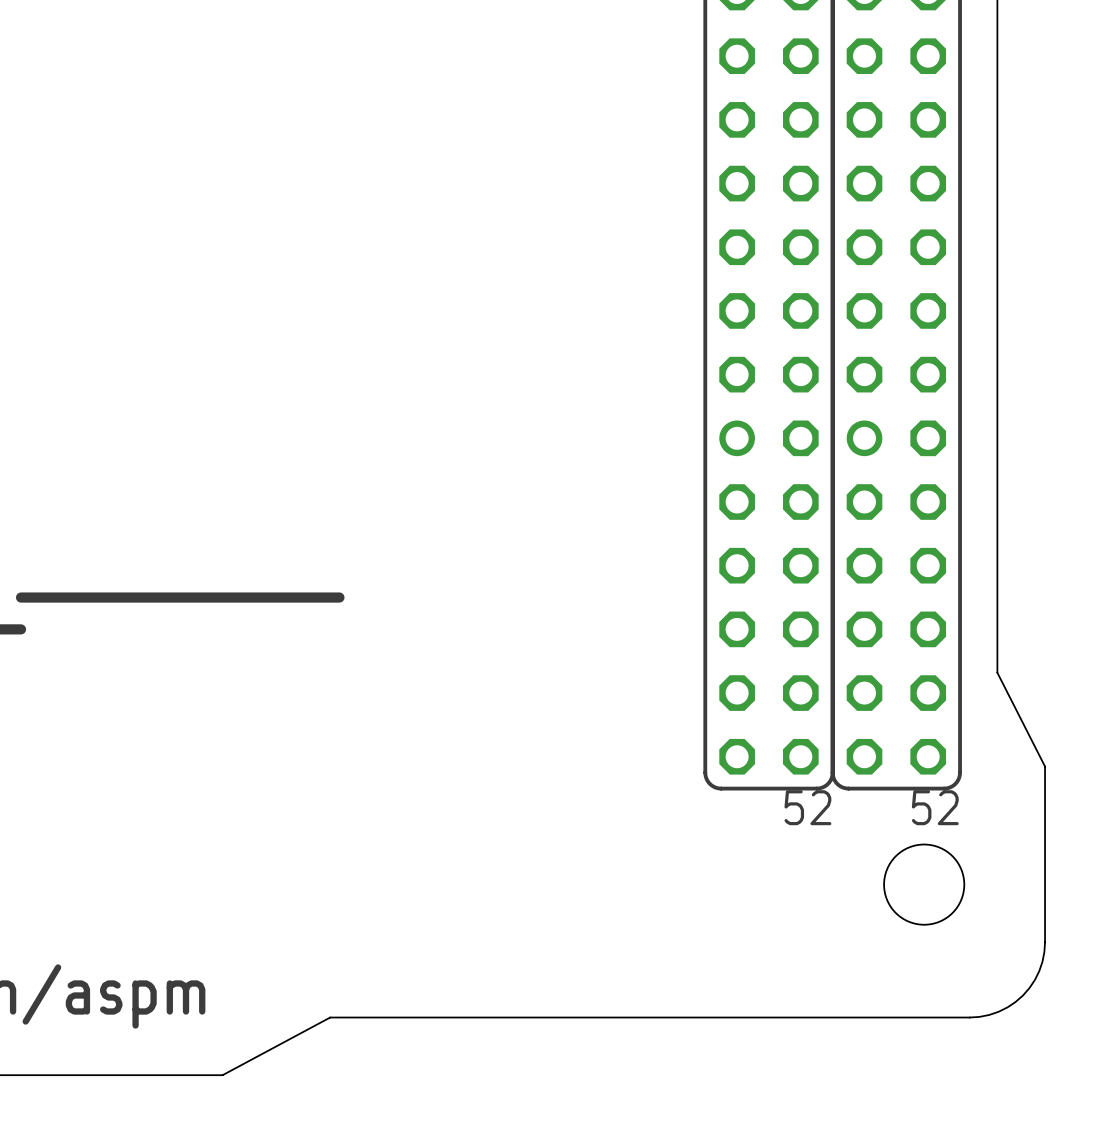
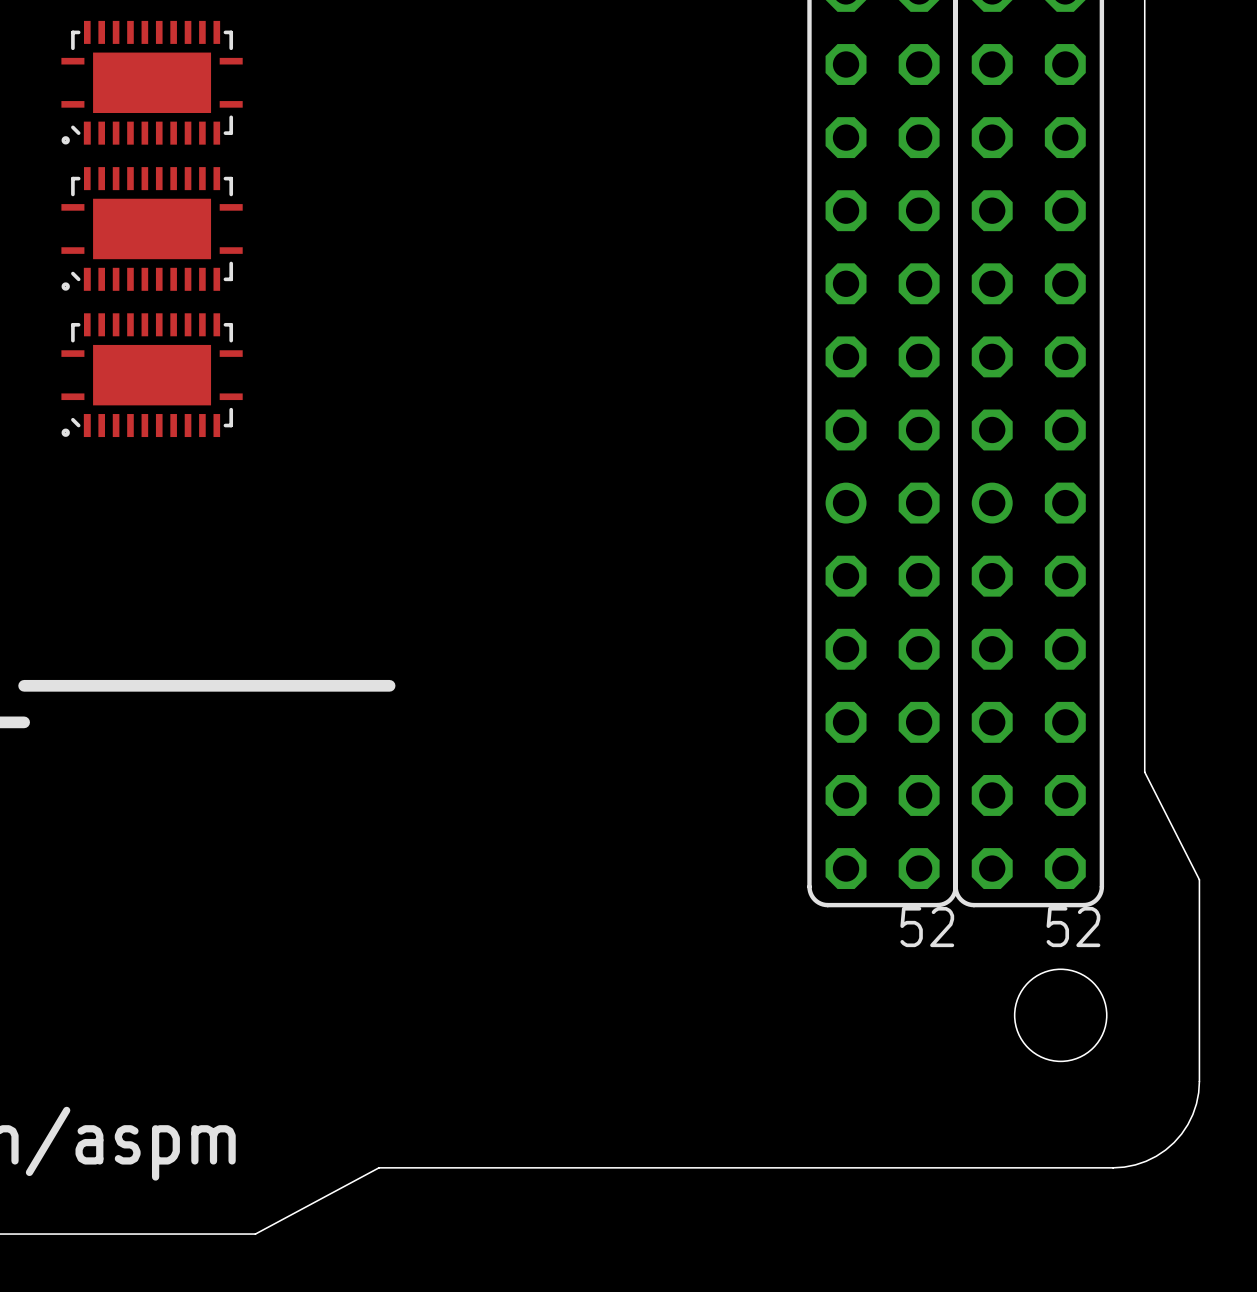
part: none -> (152, 82)
part: none -> (152, 228)
part: none -> (152, 375)

